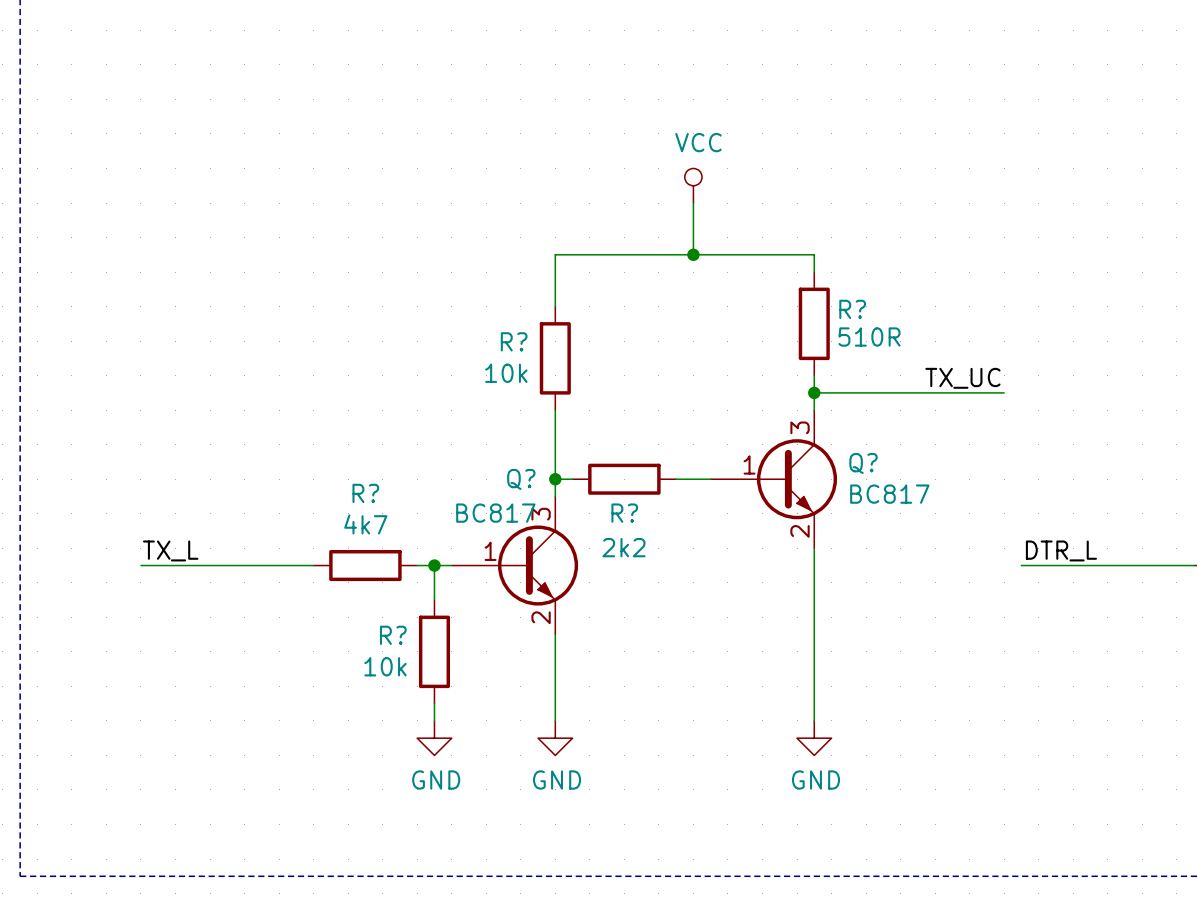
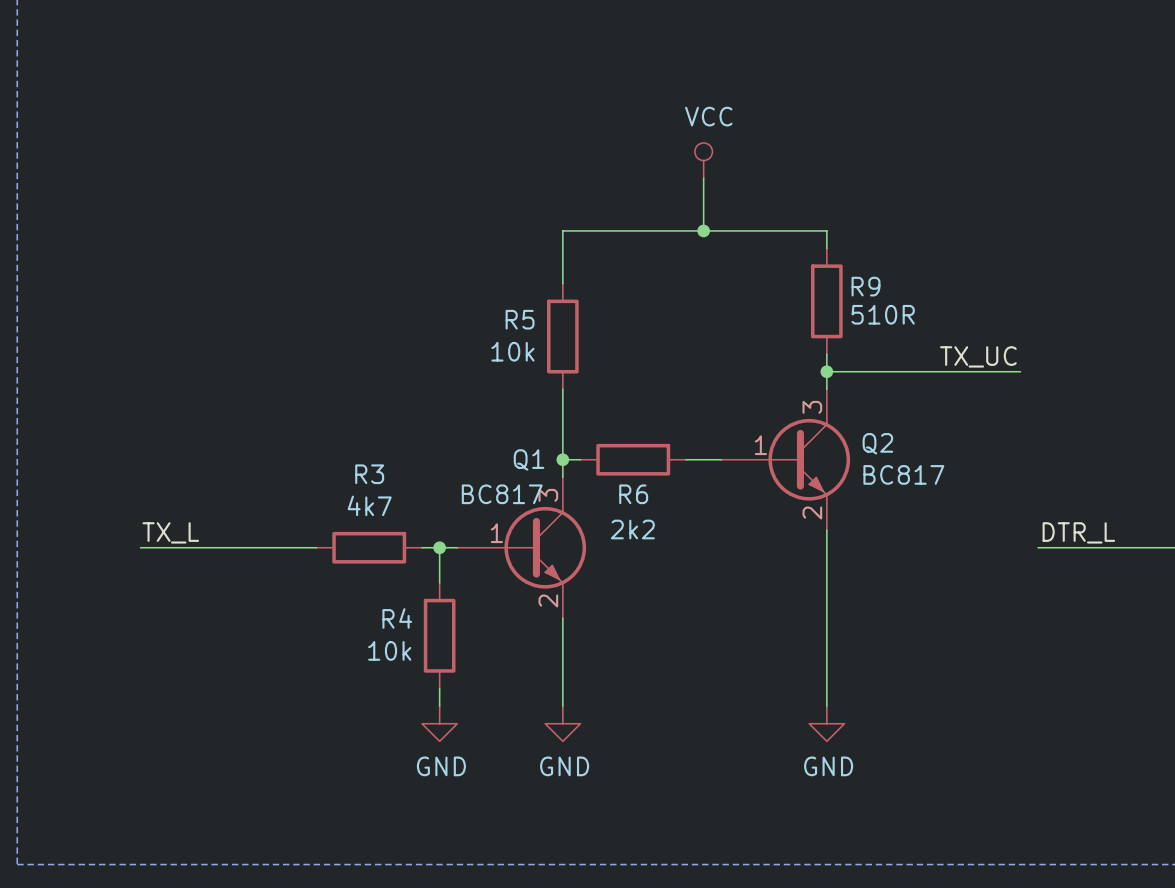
R? name: R? (852, 309) -> R9 (865, 286)
R? name: R? (514, 341) -> R5 (520, 319)
Q? name: Q? (863, 463) -> Q2 (877, 443)
Q? name: Q? (521, 479) -> Q1 (529, 459)
R? name: R? (365, 493) -> R3 (369, 474)
R? name: R? (624, 513) -> R6 (633, 494)
R? name: R? (393, 635) -> R4 (397, 618)

